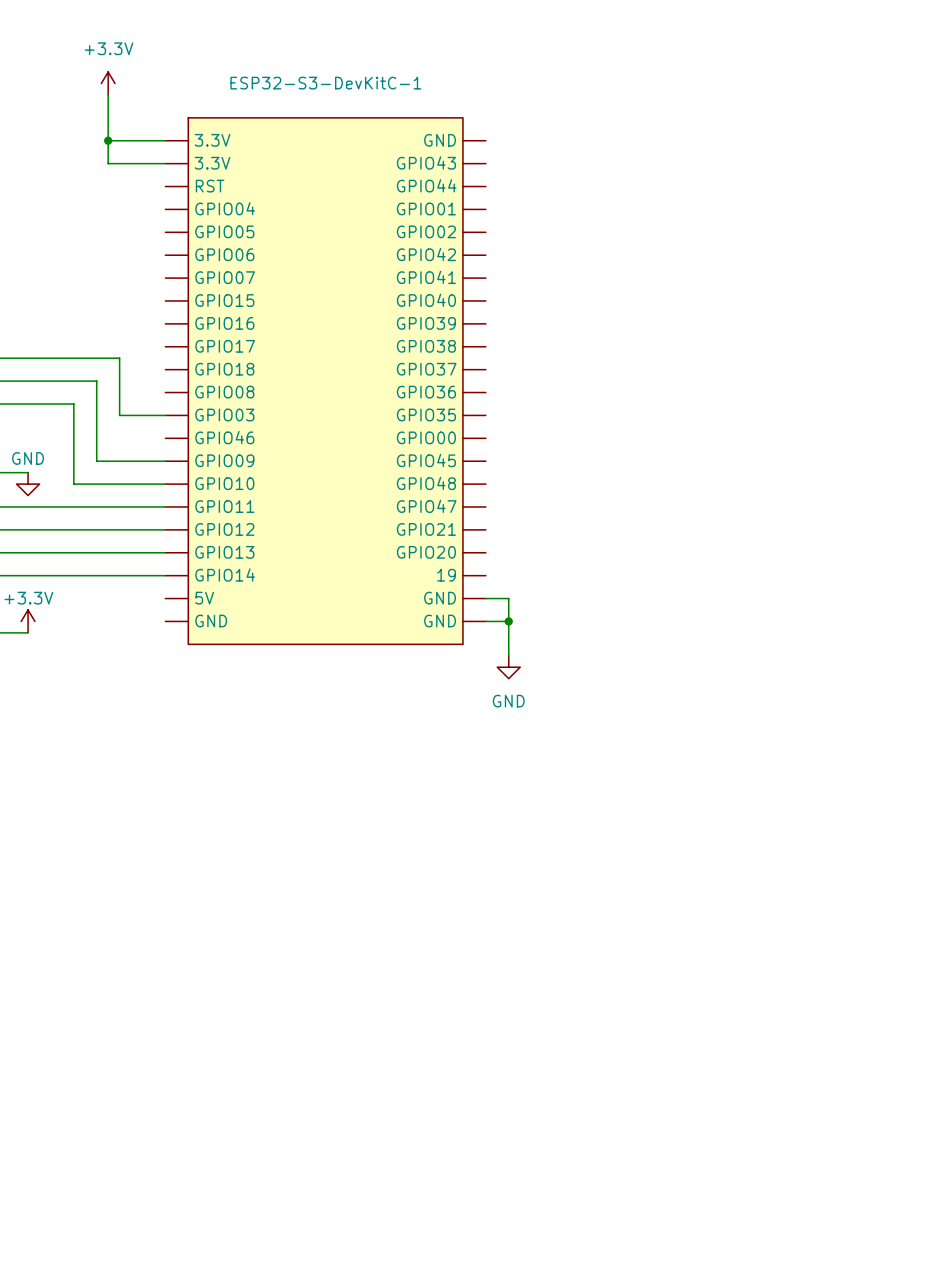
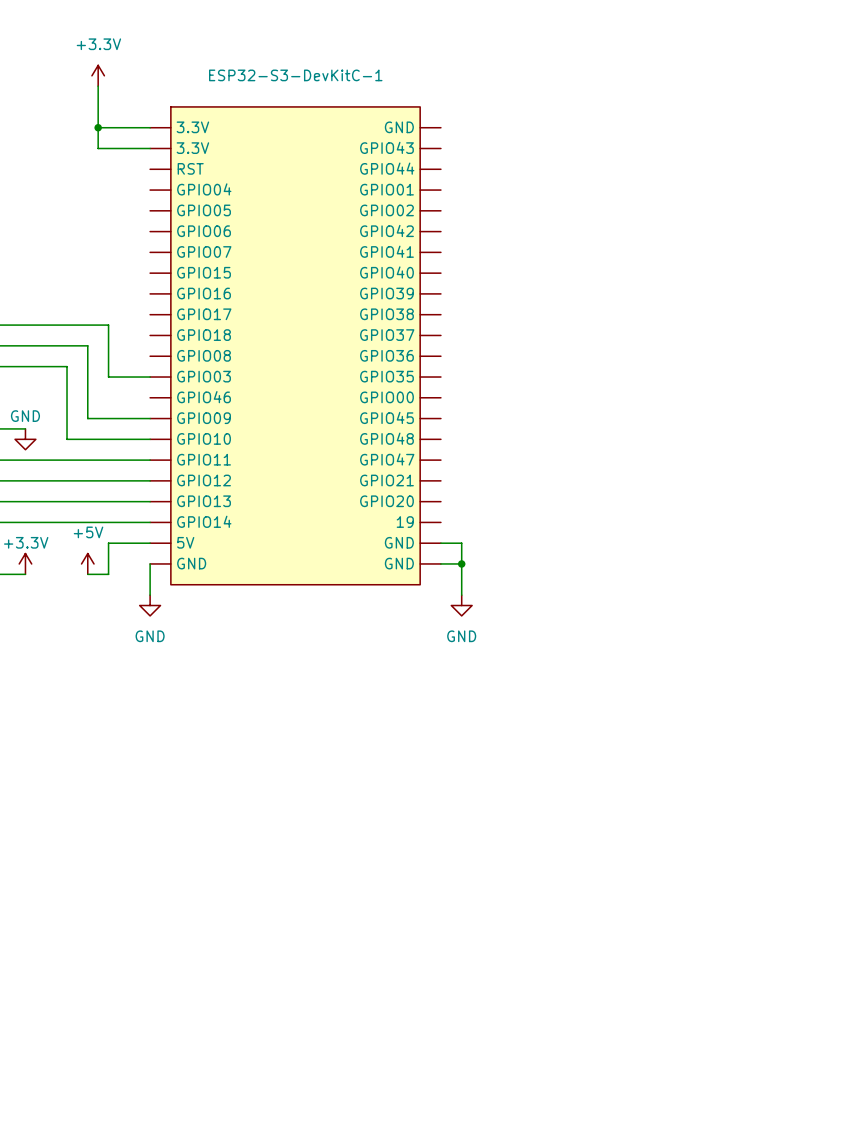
wire: none -> (150, 543) (108, 543) (108, 574) (87, 574)
power symbol: none -> +5V (87, 563)
wire: none -> (150, 563) (150, 595)
power symbol: none -> GND (150, 605)

